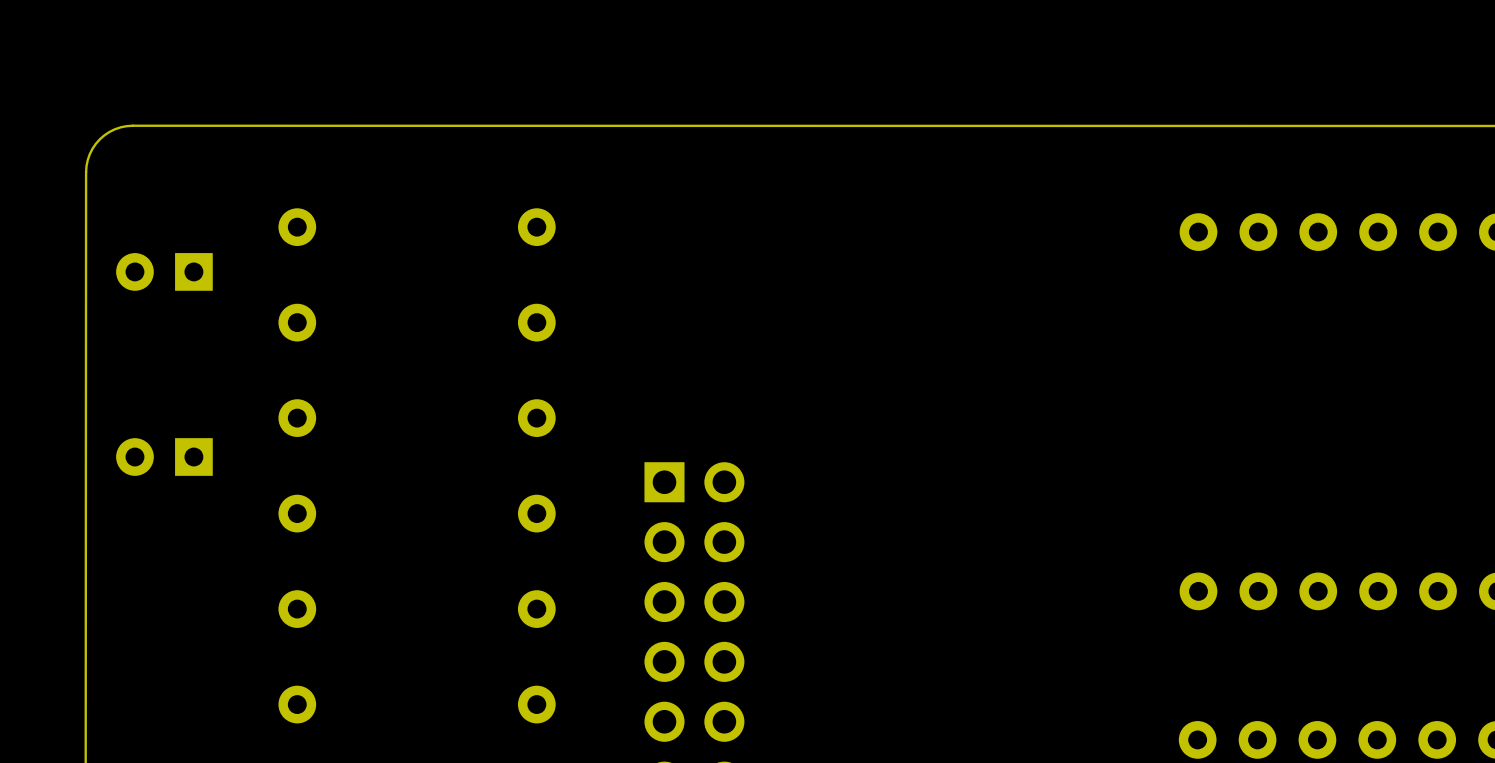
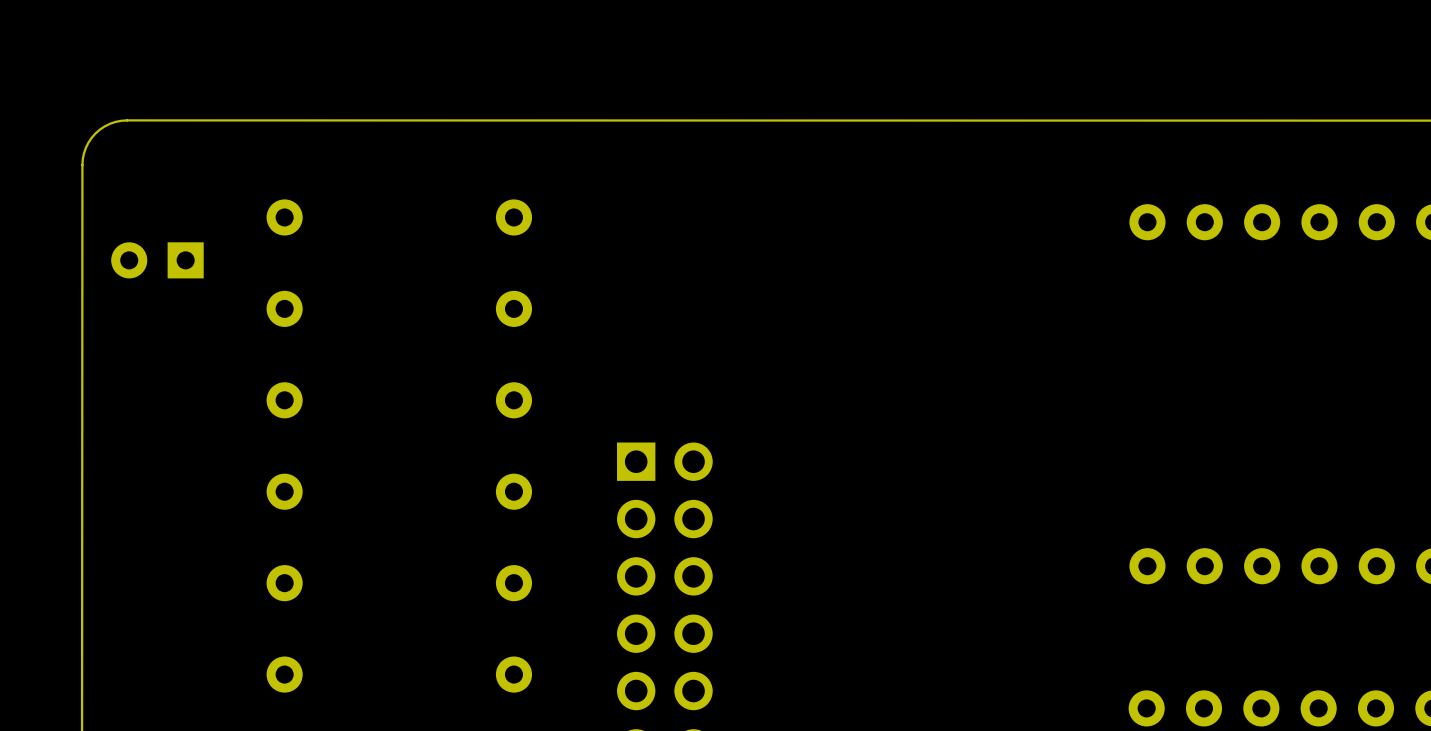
part: (164, 457) -> none

